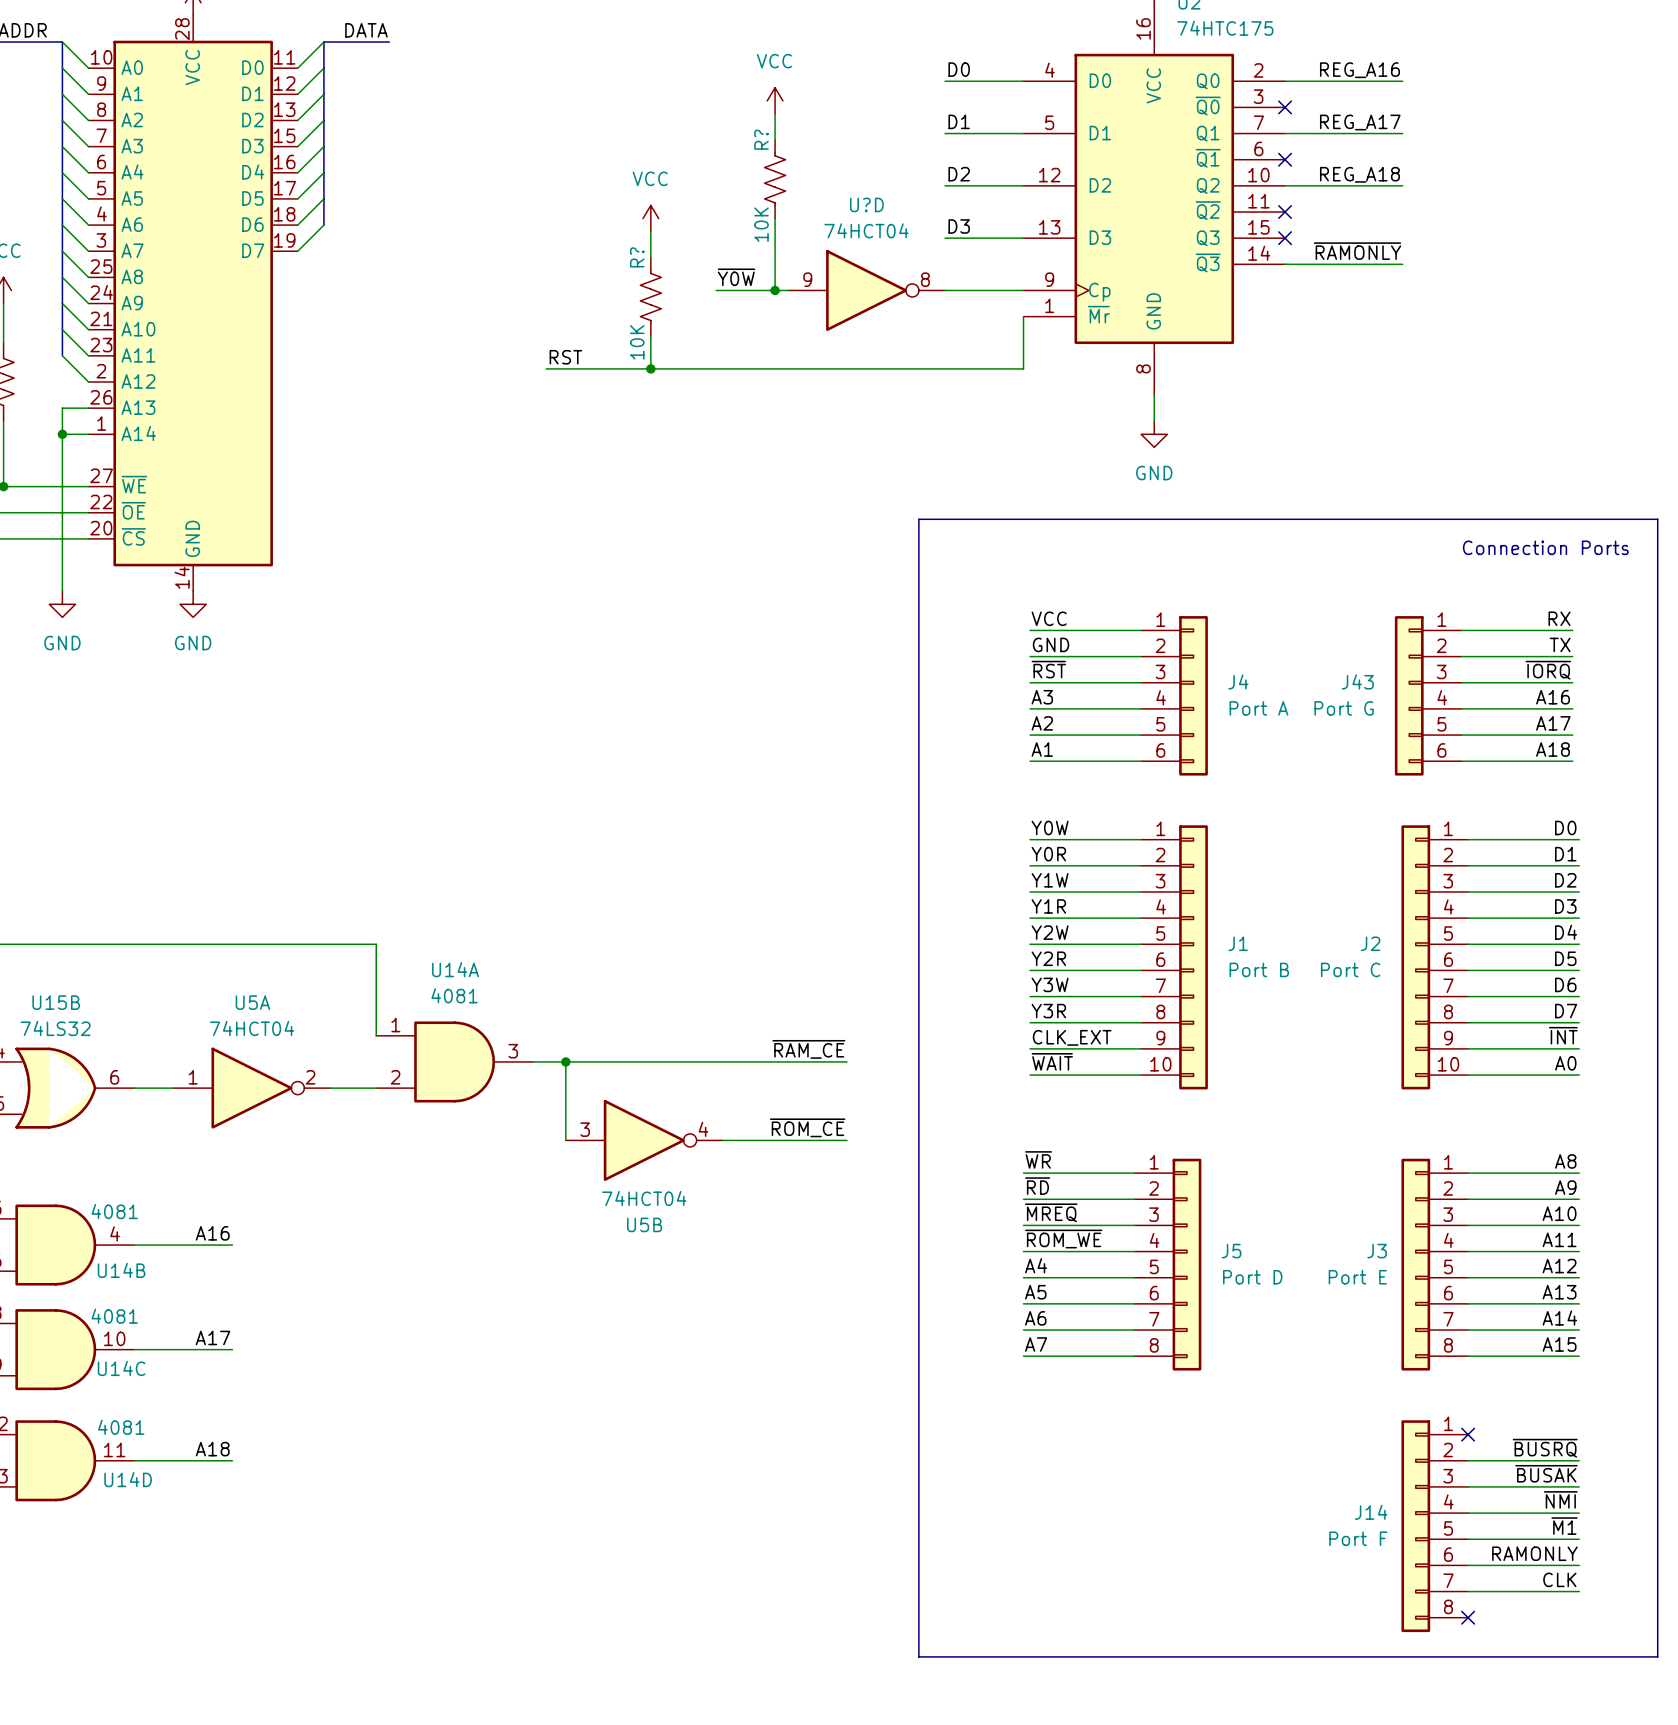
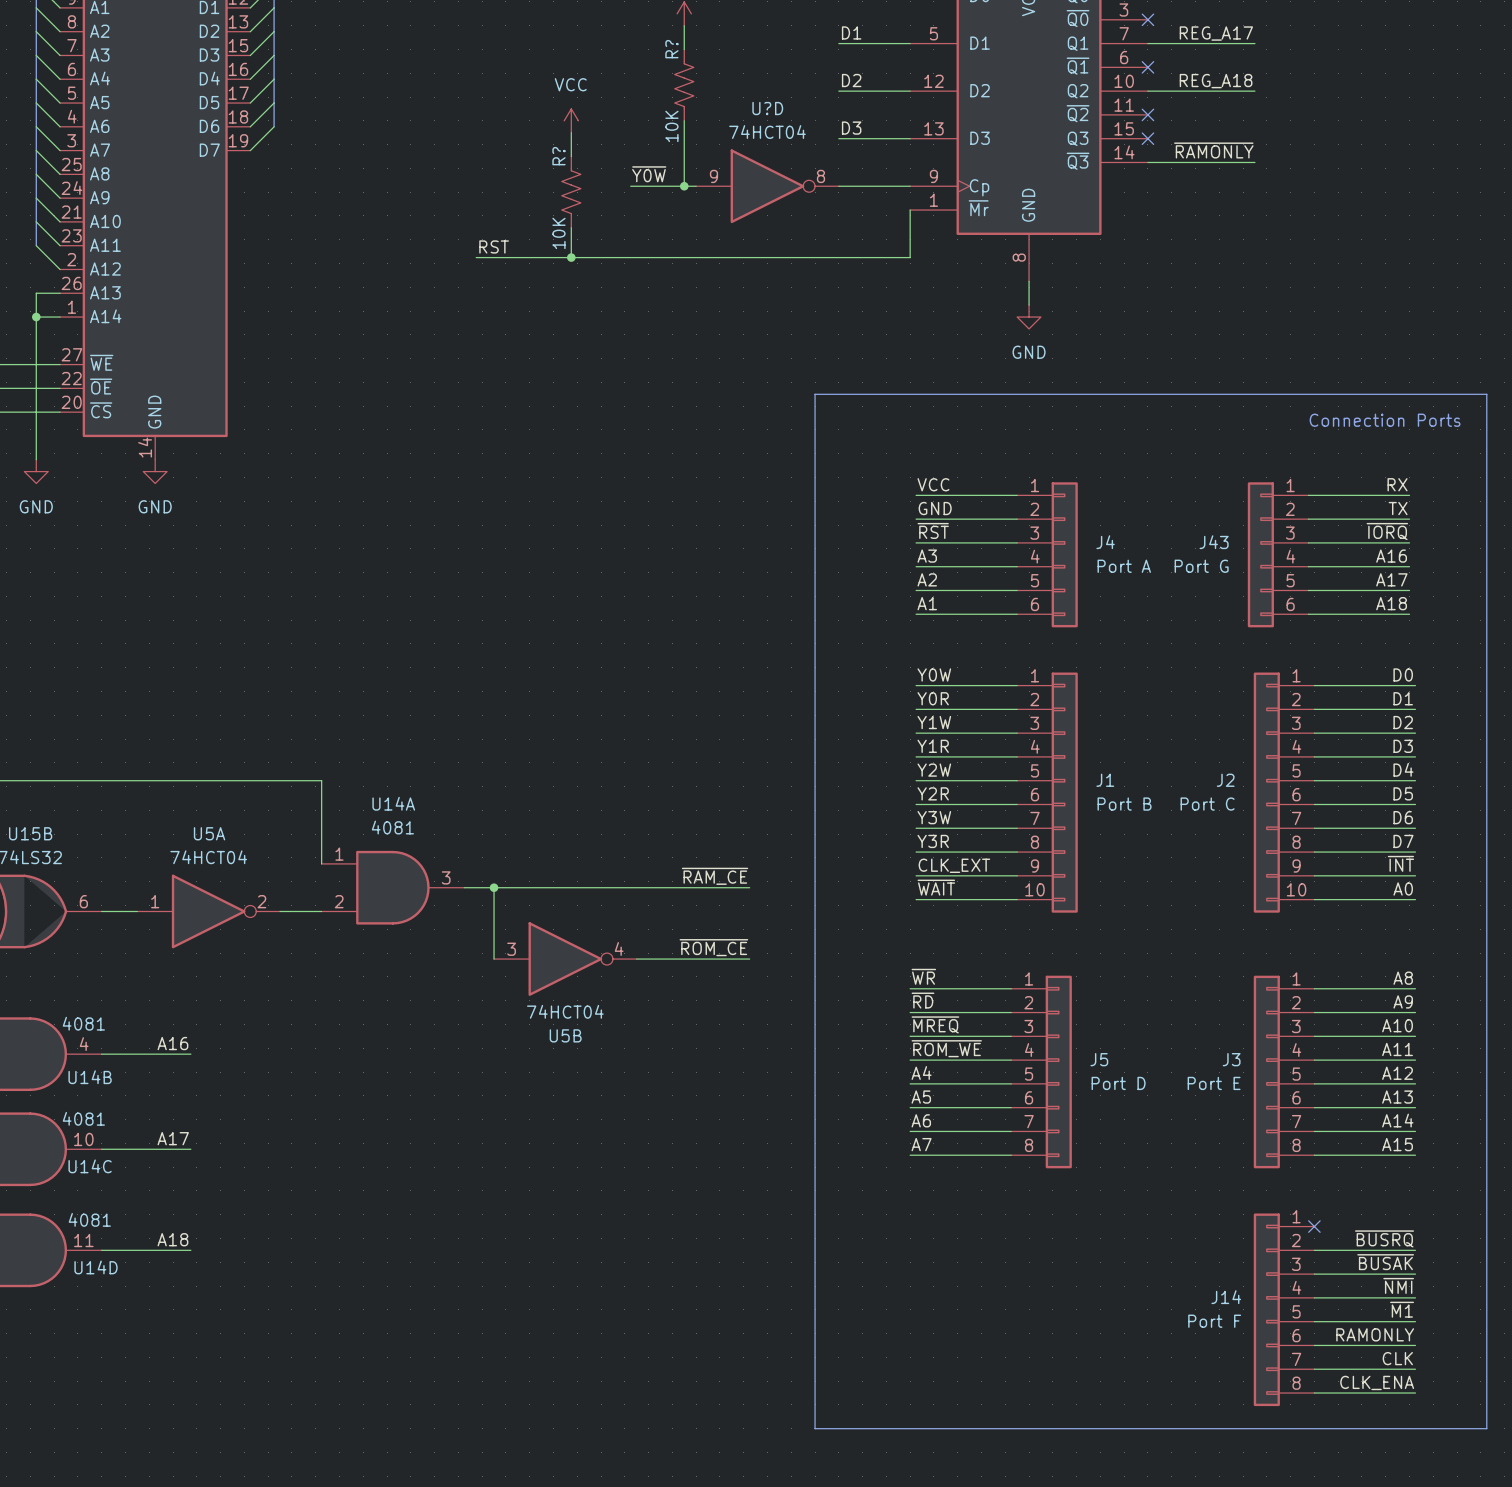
label: none -> CLK_ENA (1377, 1382)
wire: none -> (1314, 1393) (1415, 1393)
no-connect mark: (1468, 1617) -> none

